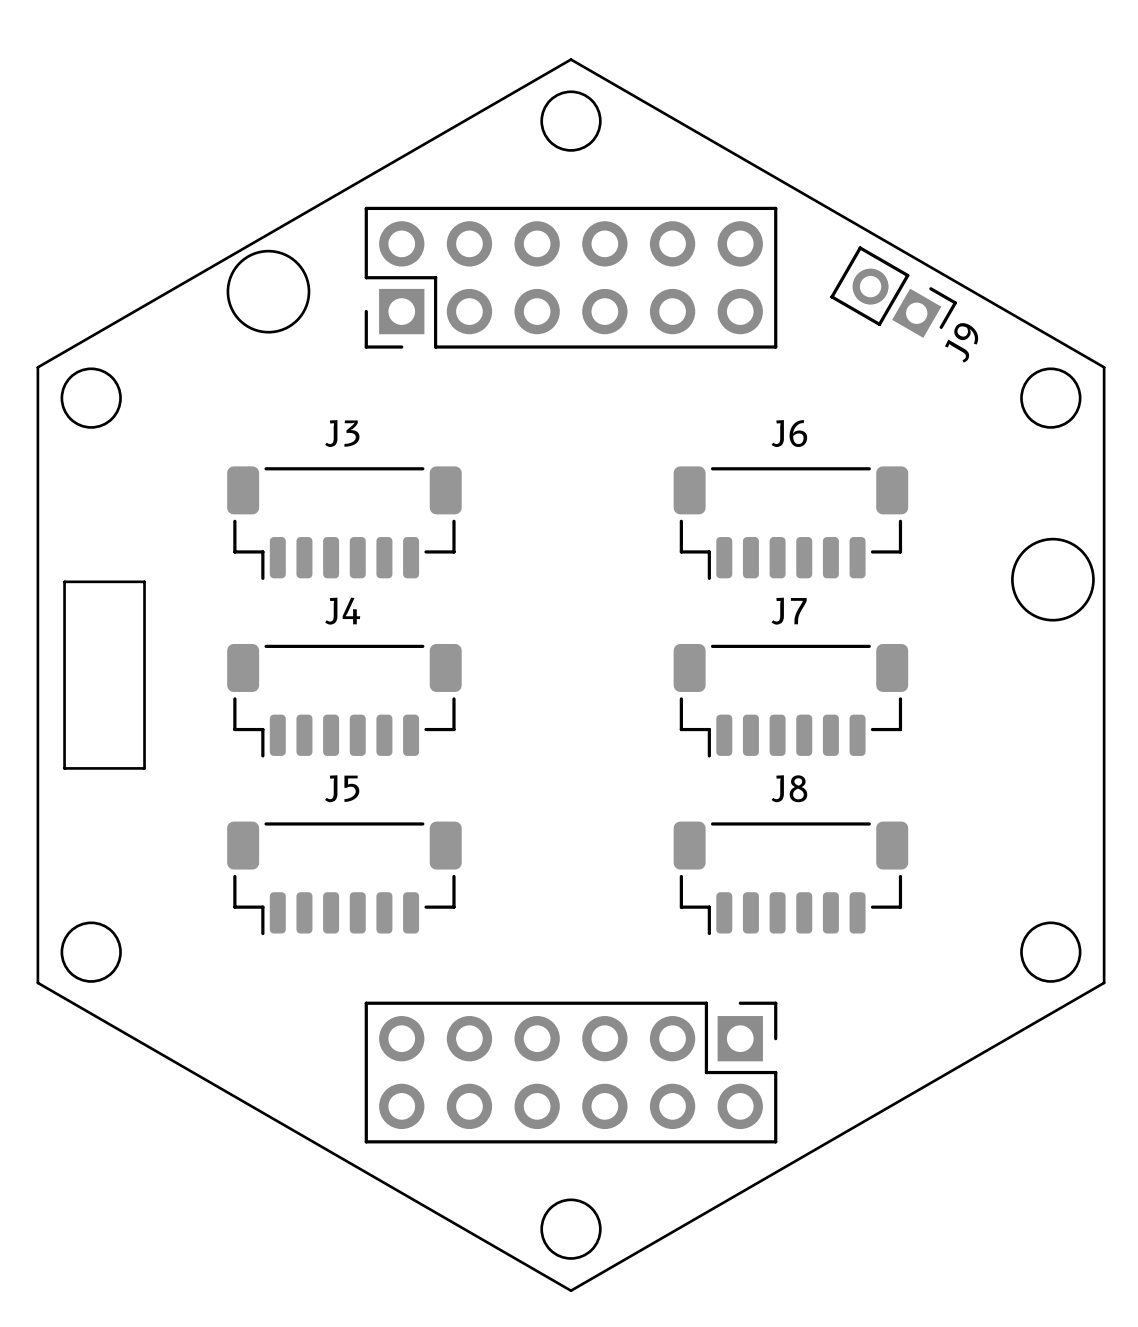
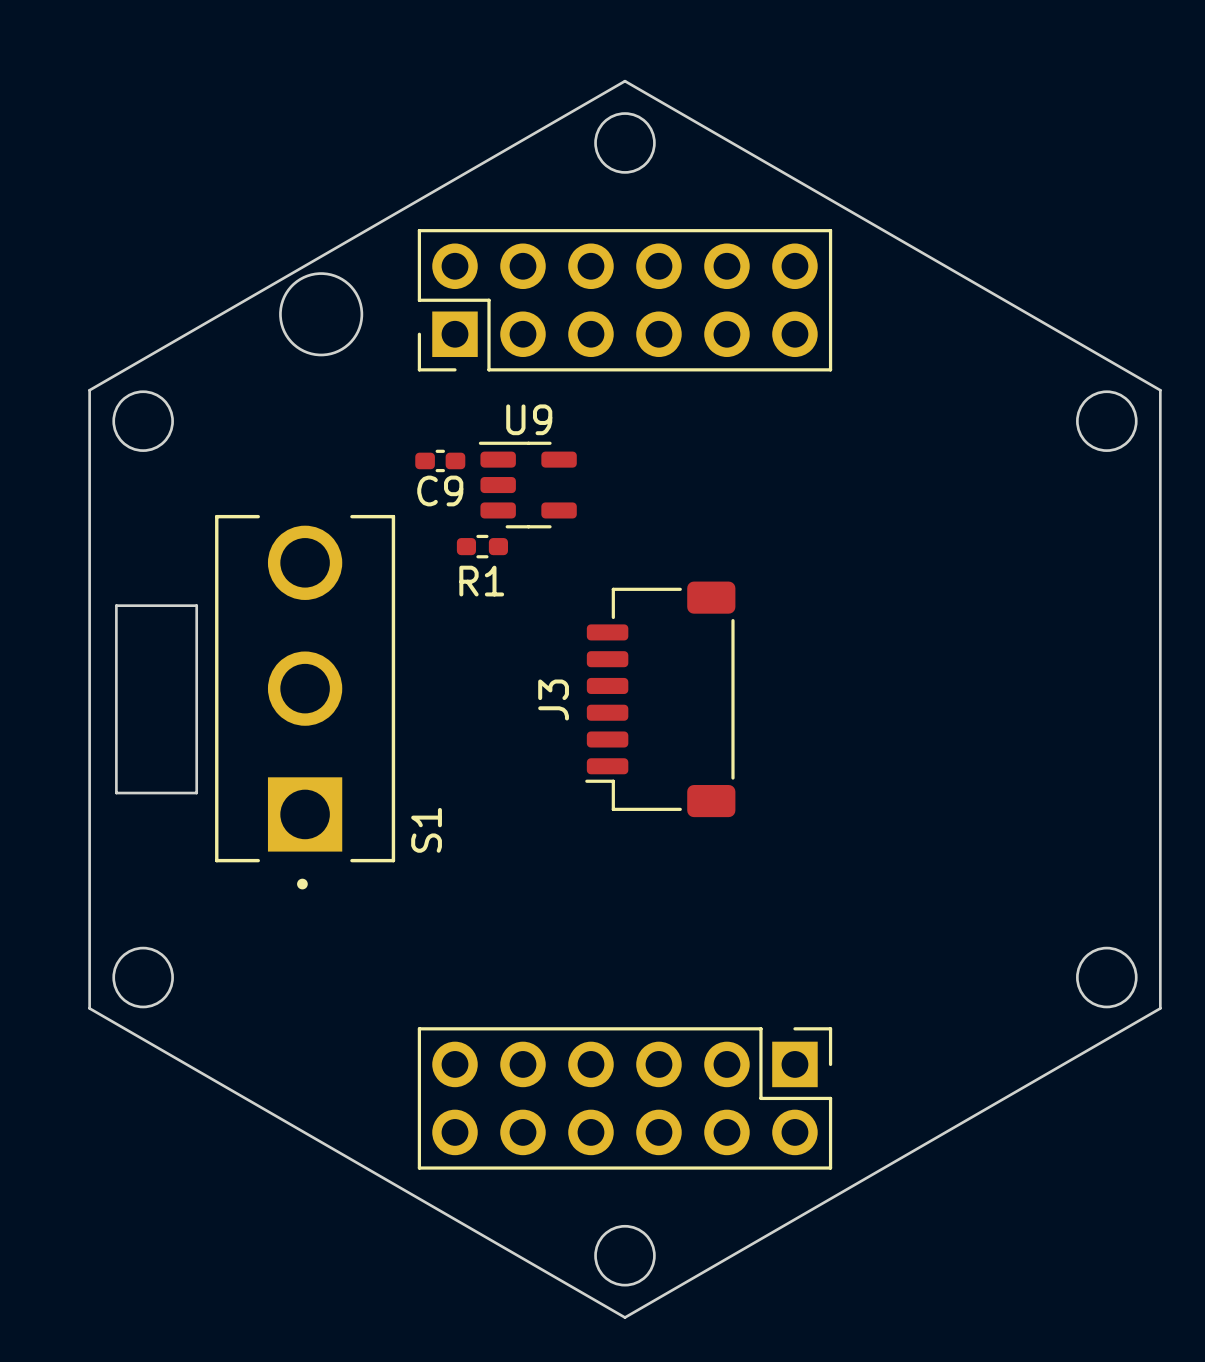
J9: (893, 292) -> none
J3 name position: J3 (342, 433) -> J3 (553, 699)
C9: none -> (440, 460)
U9: none -> (527, 485)
J3 footprint: [227, 466, 462, 580] -> [585, 581, 736, 818]
R1: none -> (482, 546)
J6: (790, 523) -> none
round board edge: [1011, 537, 1095, 622] -> none
S1: none -> (305, 702)
J4: (344, 700) -> none
J7: (790, 700) -> none
J5: (344, 878) -> none
J8: (790, 878) -> none

